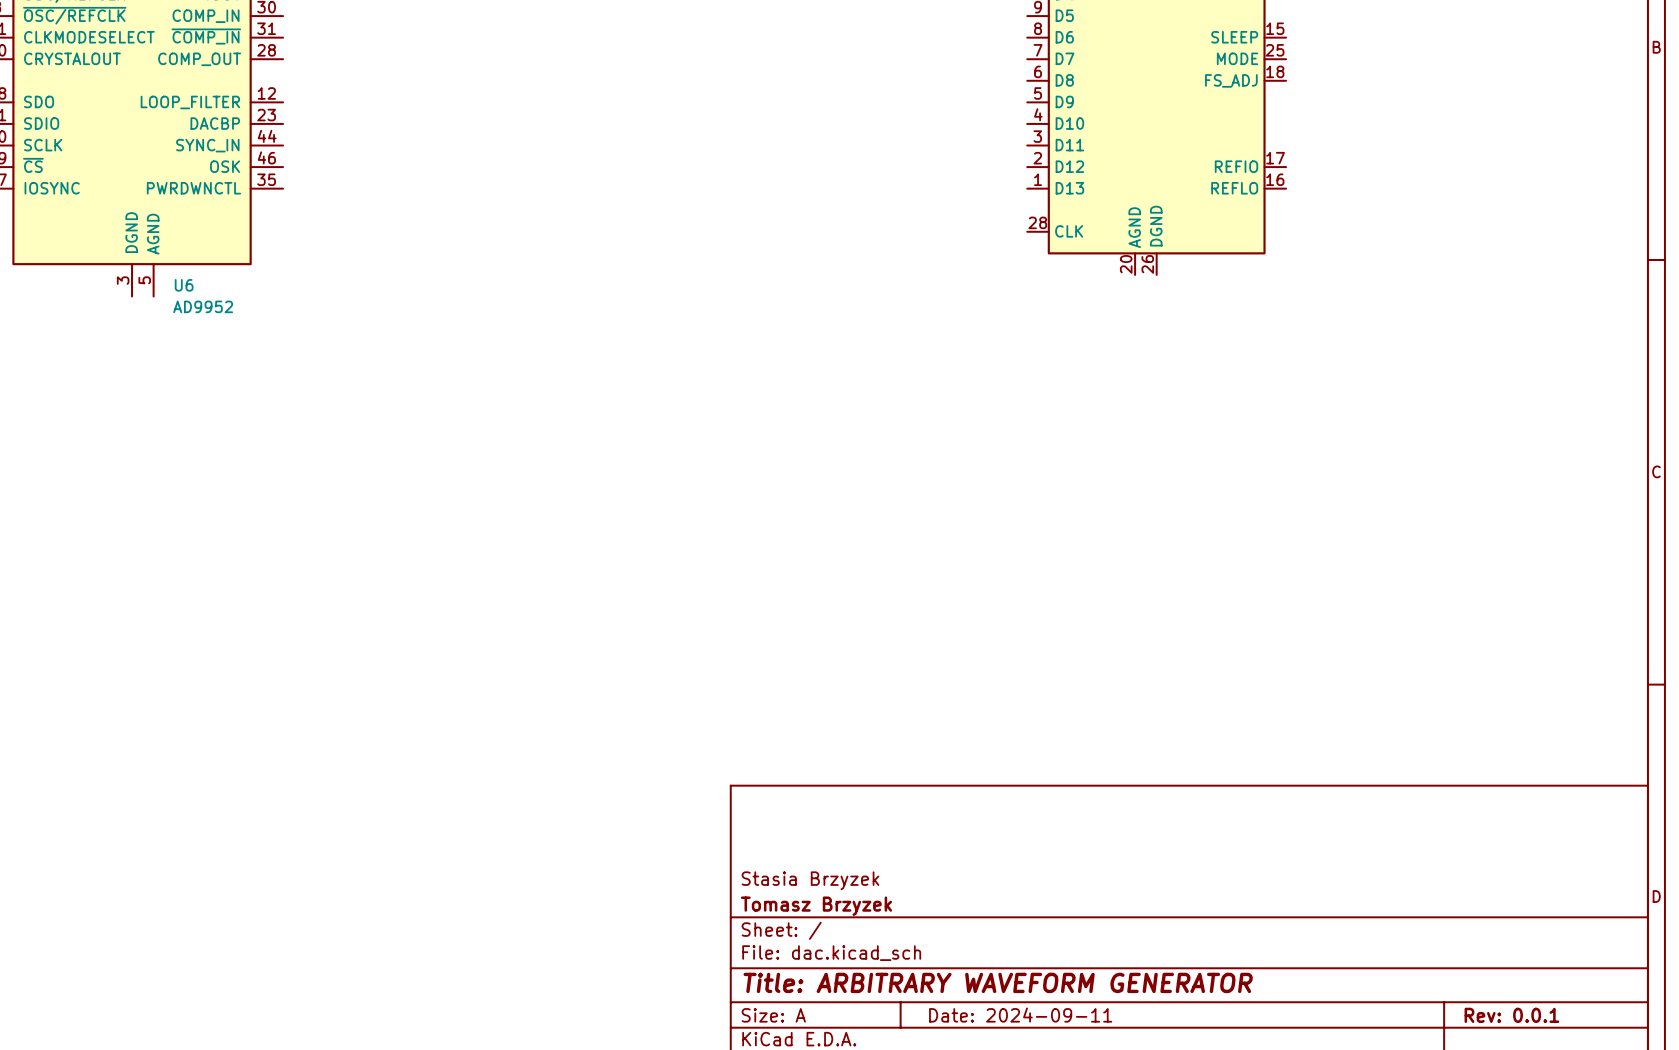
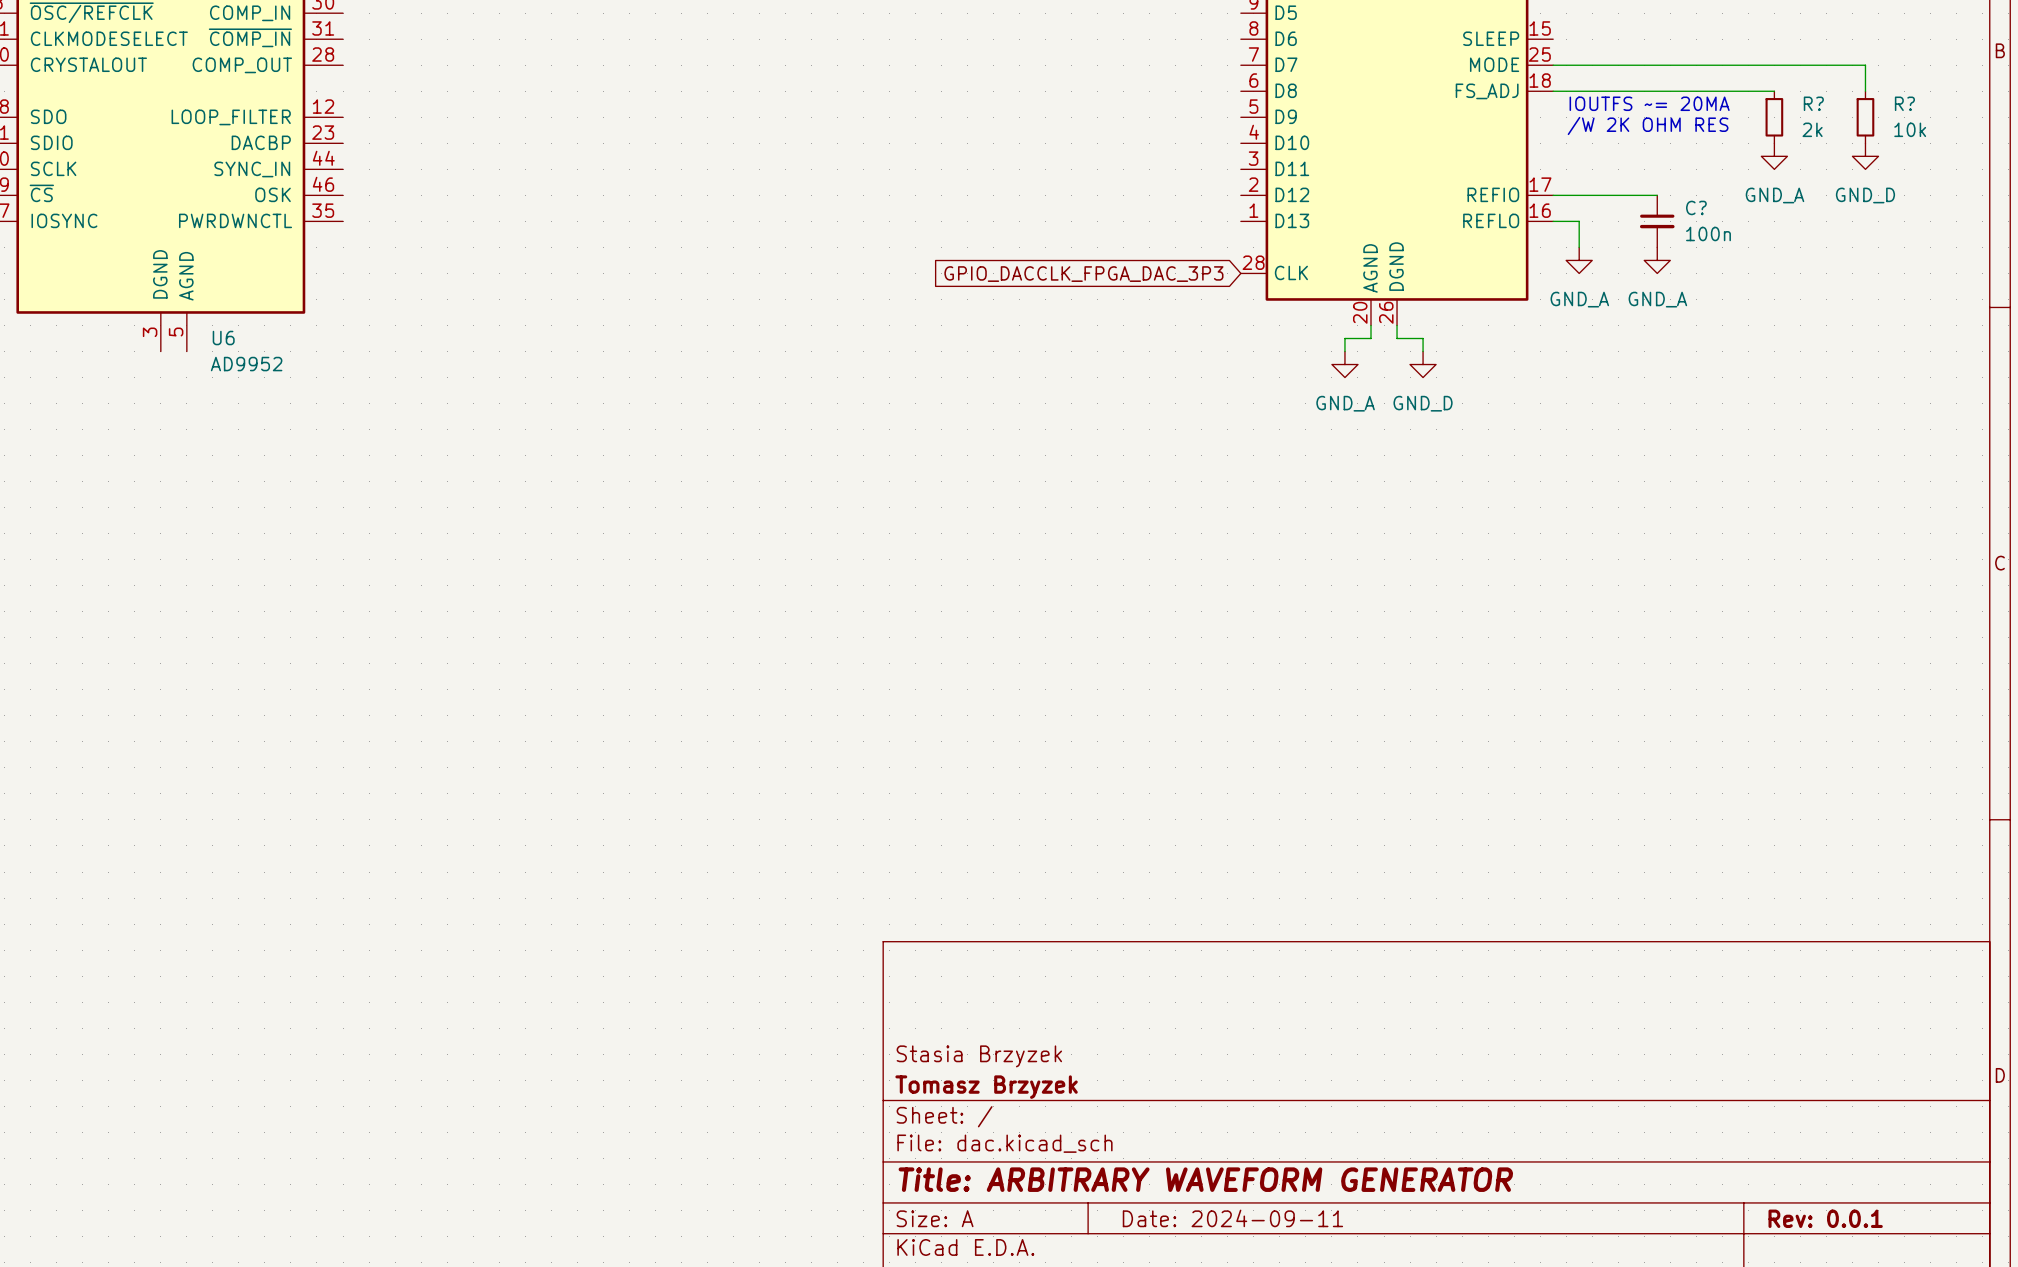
wire: none -> (1553, 65) (1865, 65) (1865, 91)
wire: none -> (1553, 91) (1774, 91)
text: none -> IOUTFS ~= 20MA (1649, 103)
R?: none -> 2k (1774, 117)
R?: none -> 10k (1865, 117)
text: none -> /W 2K OHM RES (1648, 125)
power symbol: none -> GND_A (1774, 156)
power symbol: none -> GND_D (1865, 156)
wire: none -> (1553, 195) (1657, 195)
wire: none -> (1553, 221) (1579, 221) (1579, 247)
C?: none -> 100n (1657, 221)
power symbol: none -> GND_A (1579, 260)
power symbol: none -> GND_A (1657, 260)
global label: none -> GPIO_DACCLK_FPGA_DAC_3P3 (1083, 274)
wire: none -> (1370, 325) (1370, 338) (1344, 338) (1344, 351)
wire: none -> (1397, 325) (1397, 338) (1423, 338) (1423, 351)
power symbol: none -> GND_A (1344, 364)
power symbol: none -> GND_D (1423, 364)

